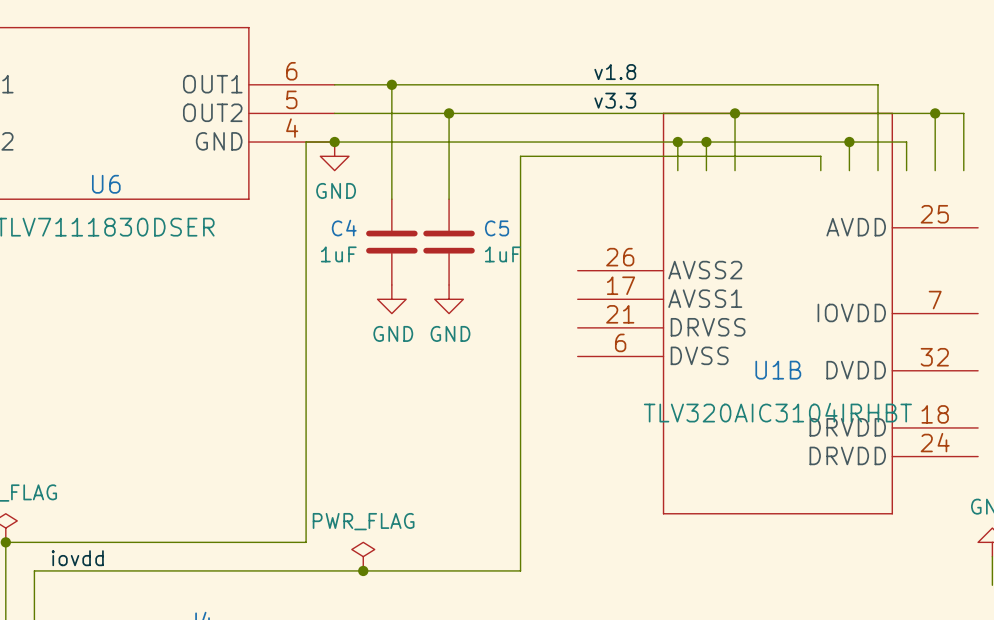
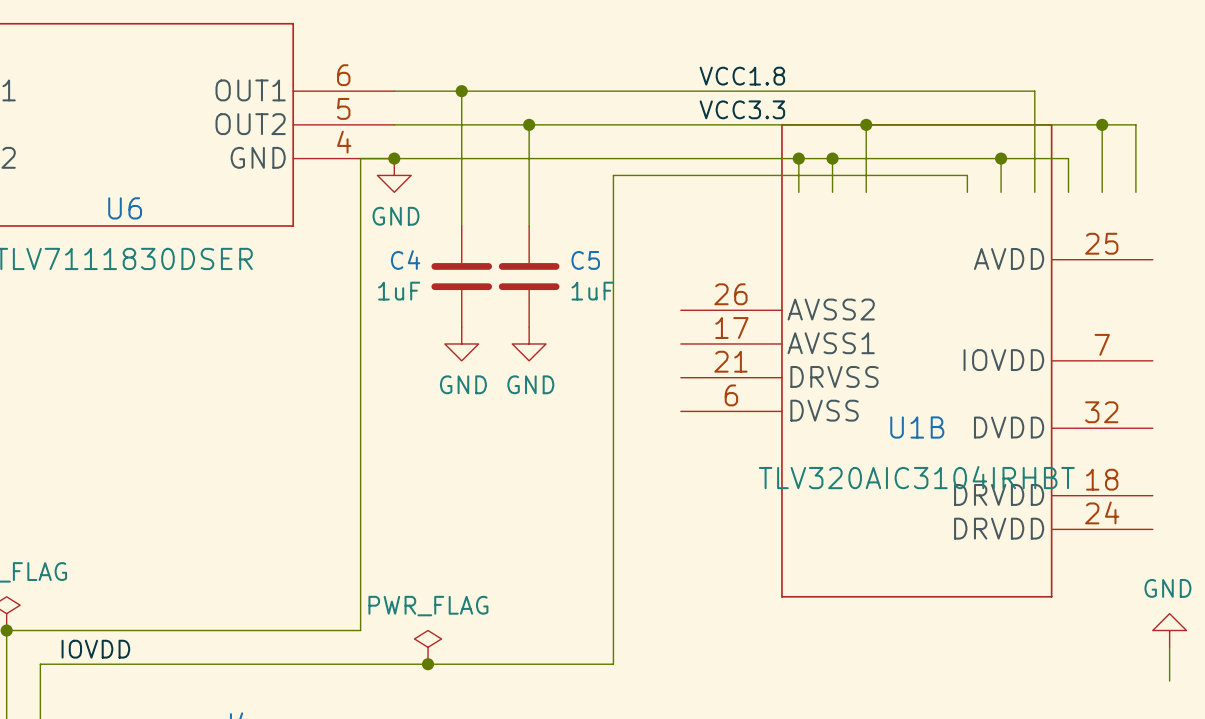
label: v1.8 (615, 72) -> VCC1.8 (742, 76)
label: v3.3 (615, 100) -> VCC3.3 (742, 109)
label: iovdd (77, 558) -> IOVDD (95, 649)

